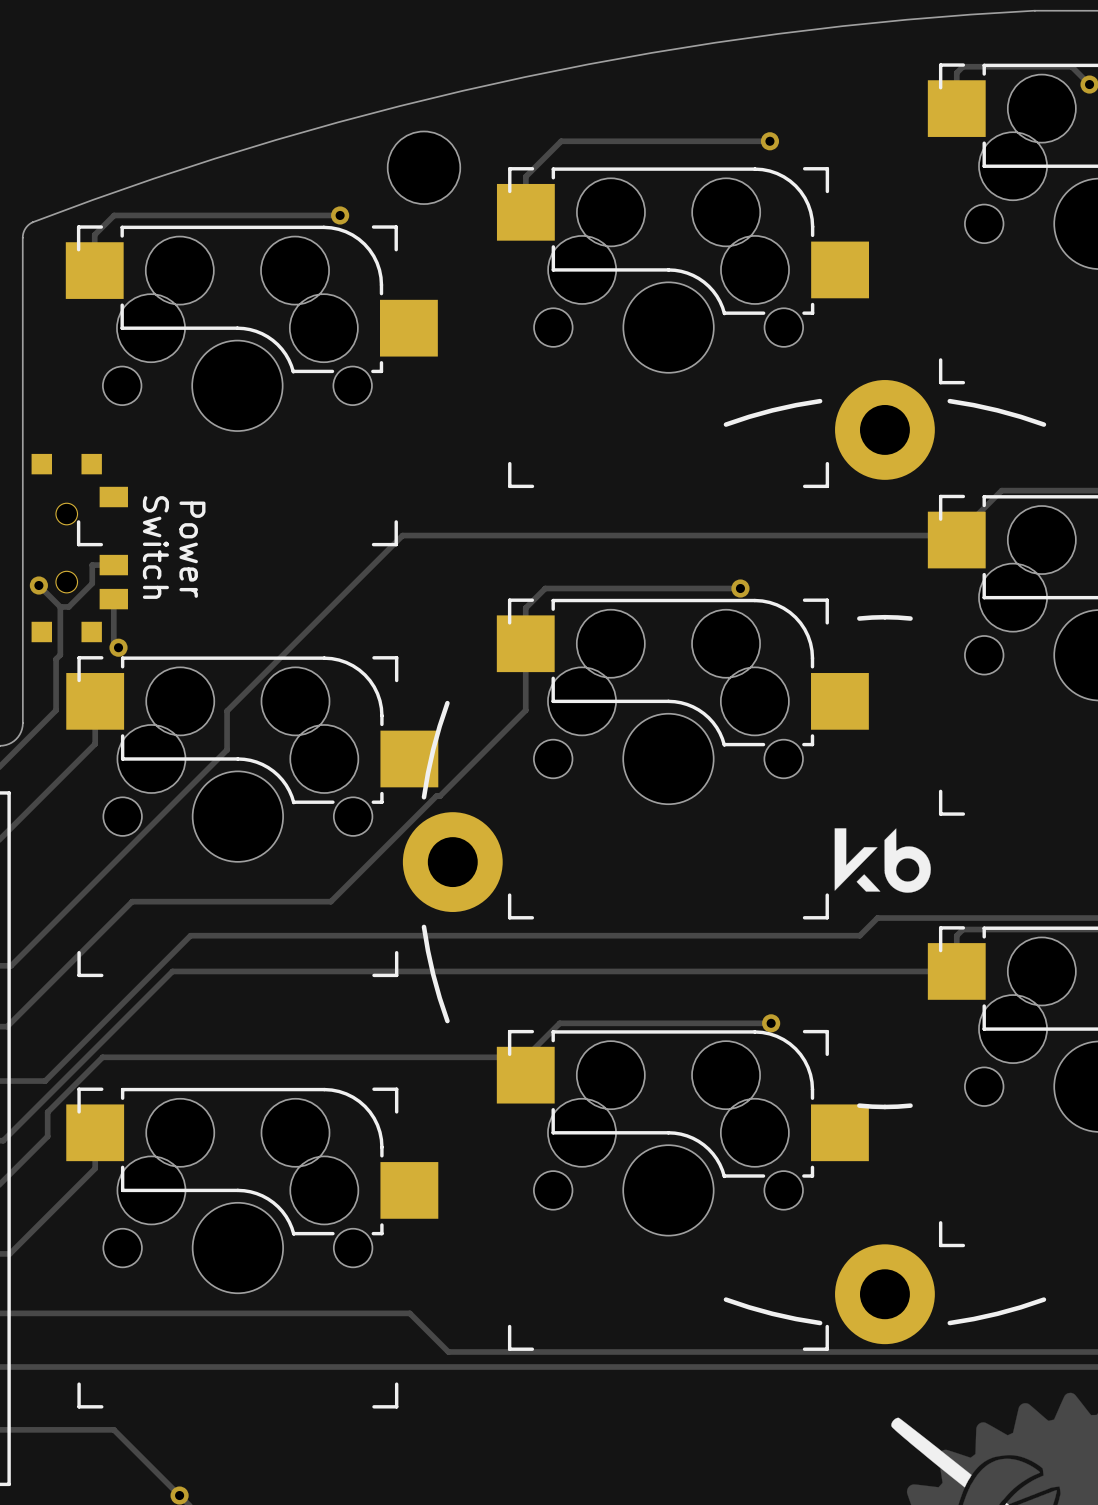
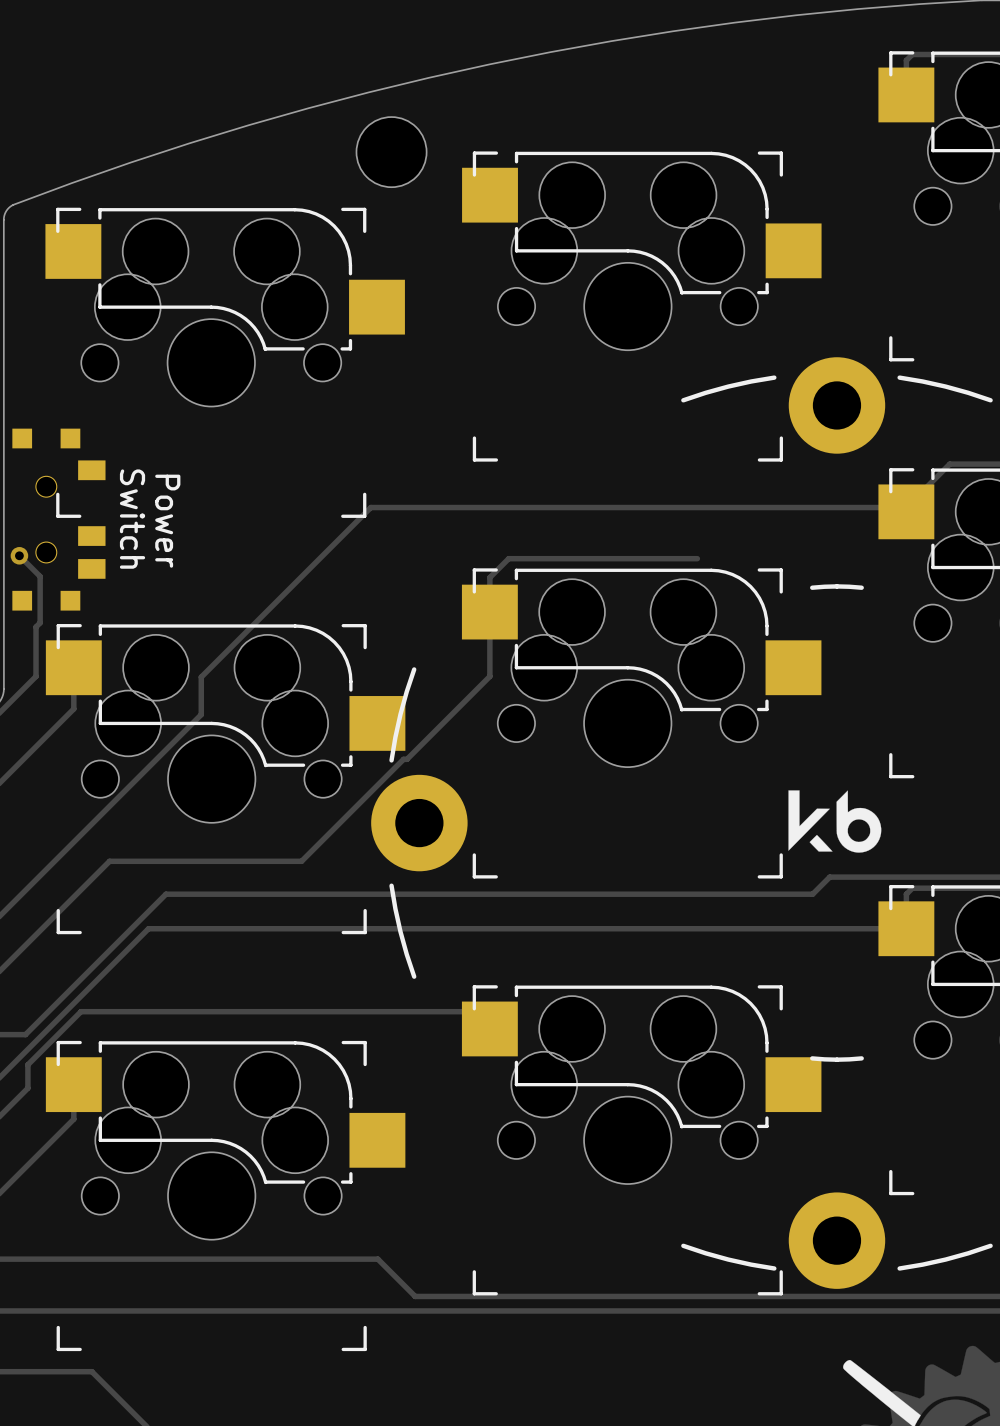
track: (769, 141) (561, 141) (525, 176) (525, 212) -> none
via: (769, 141) -> none
track: (340, 215) (114, 215) (94, 234) (94, 270) -> none
via: (340, 215) -> none
track: (113, 565) (92, 565) (92, 583) (68, 606) (60, 606) -> none
via: (740, 588) -> none
track: (113, 599) (113, 643) (118, 647) -> none
via: (118, 647) -> none
track: (771, 1023) (559, 1023) (525, 1057) (525, 1075) -> none
via: (771, 1023) -> none

